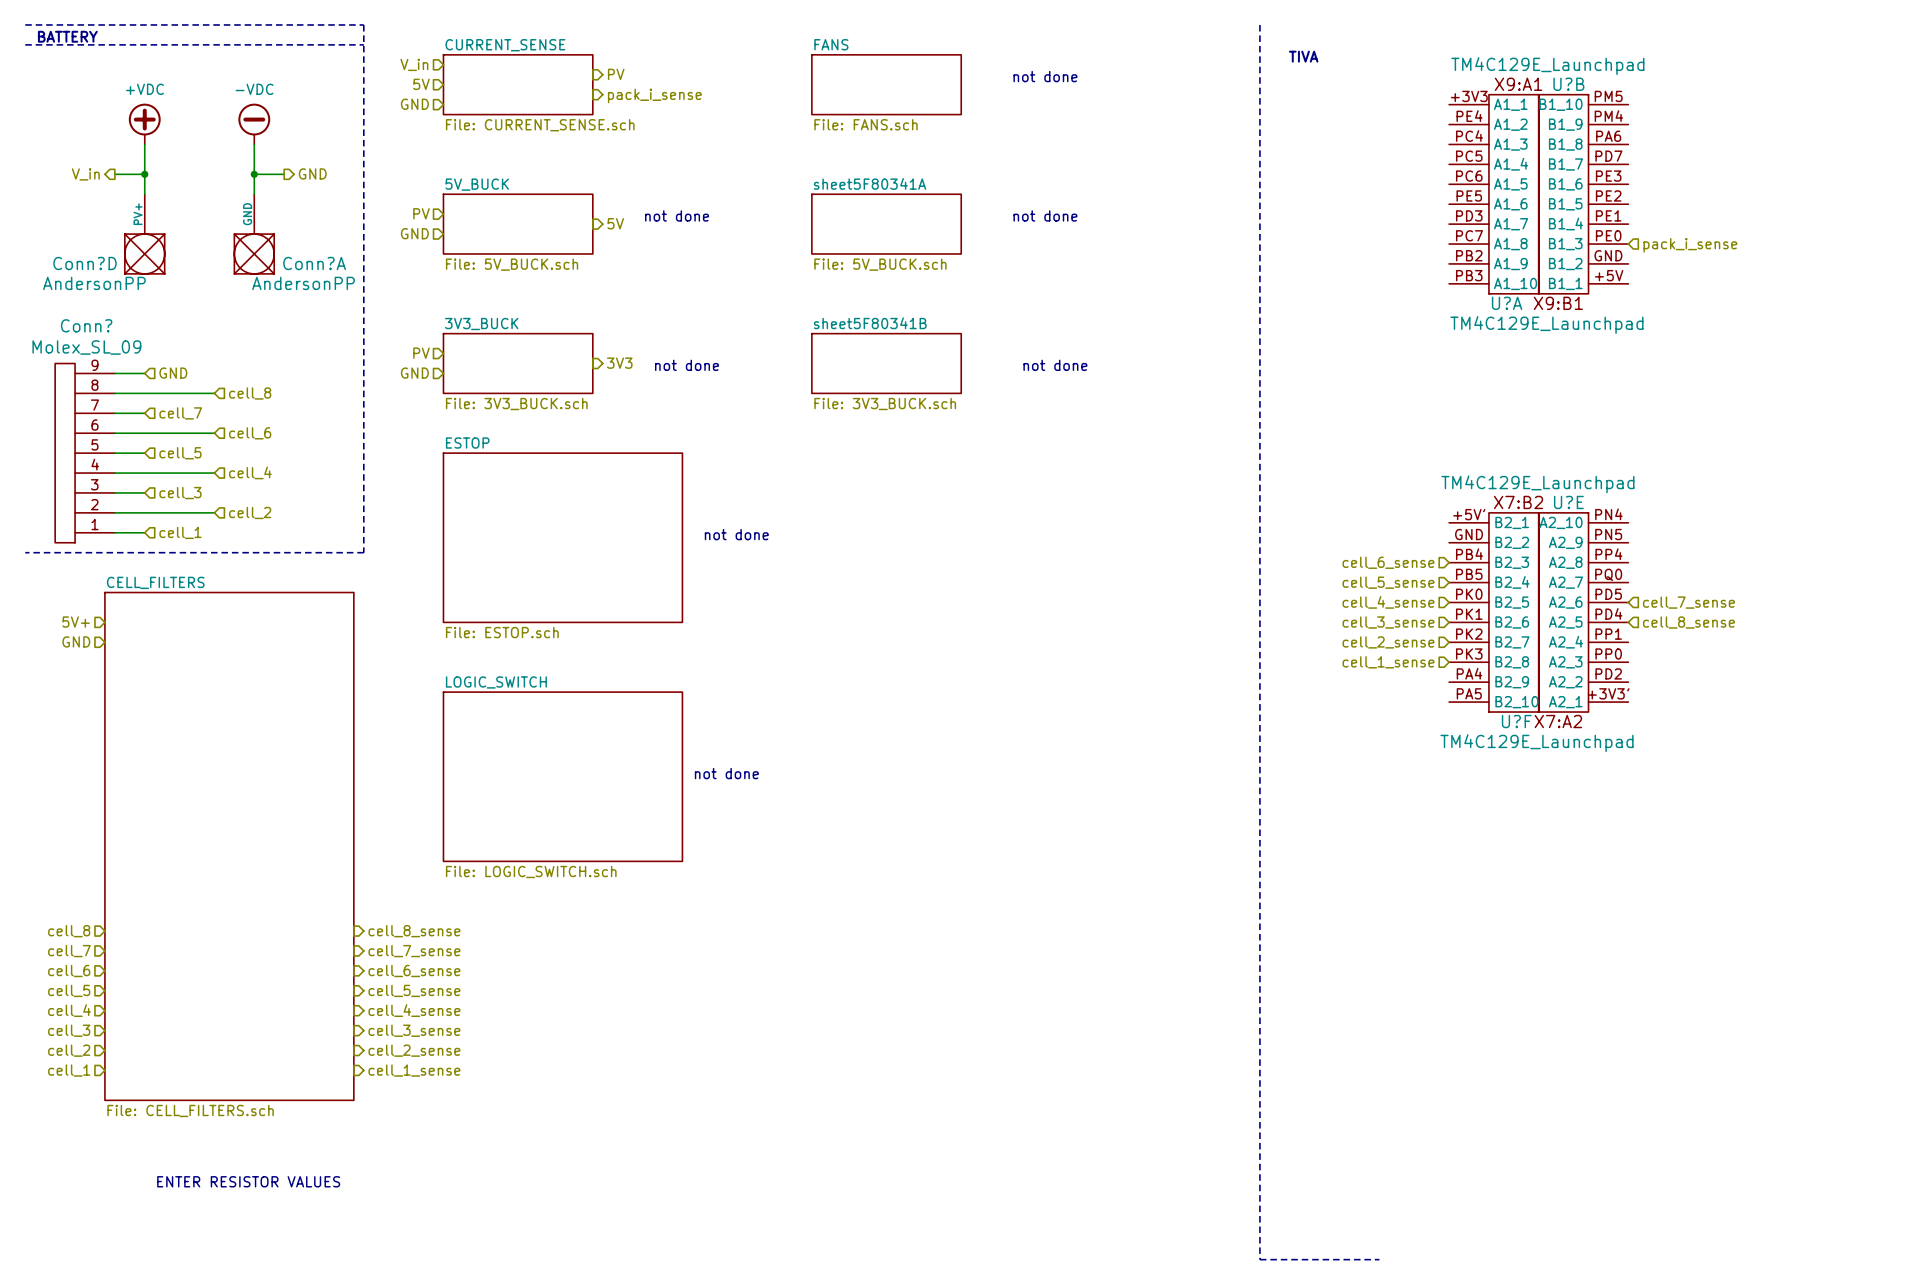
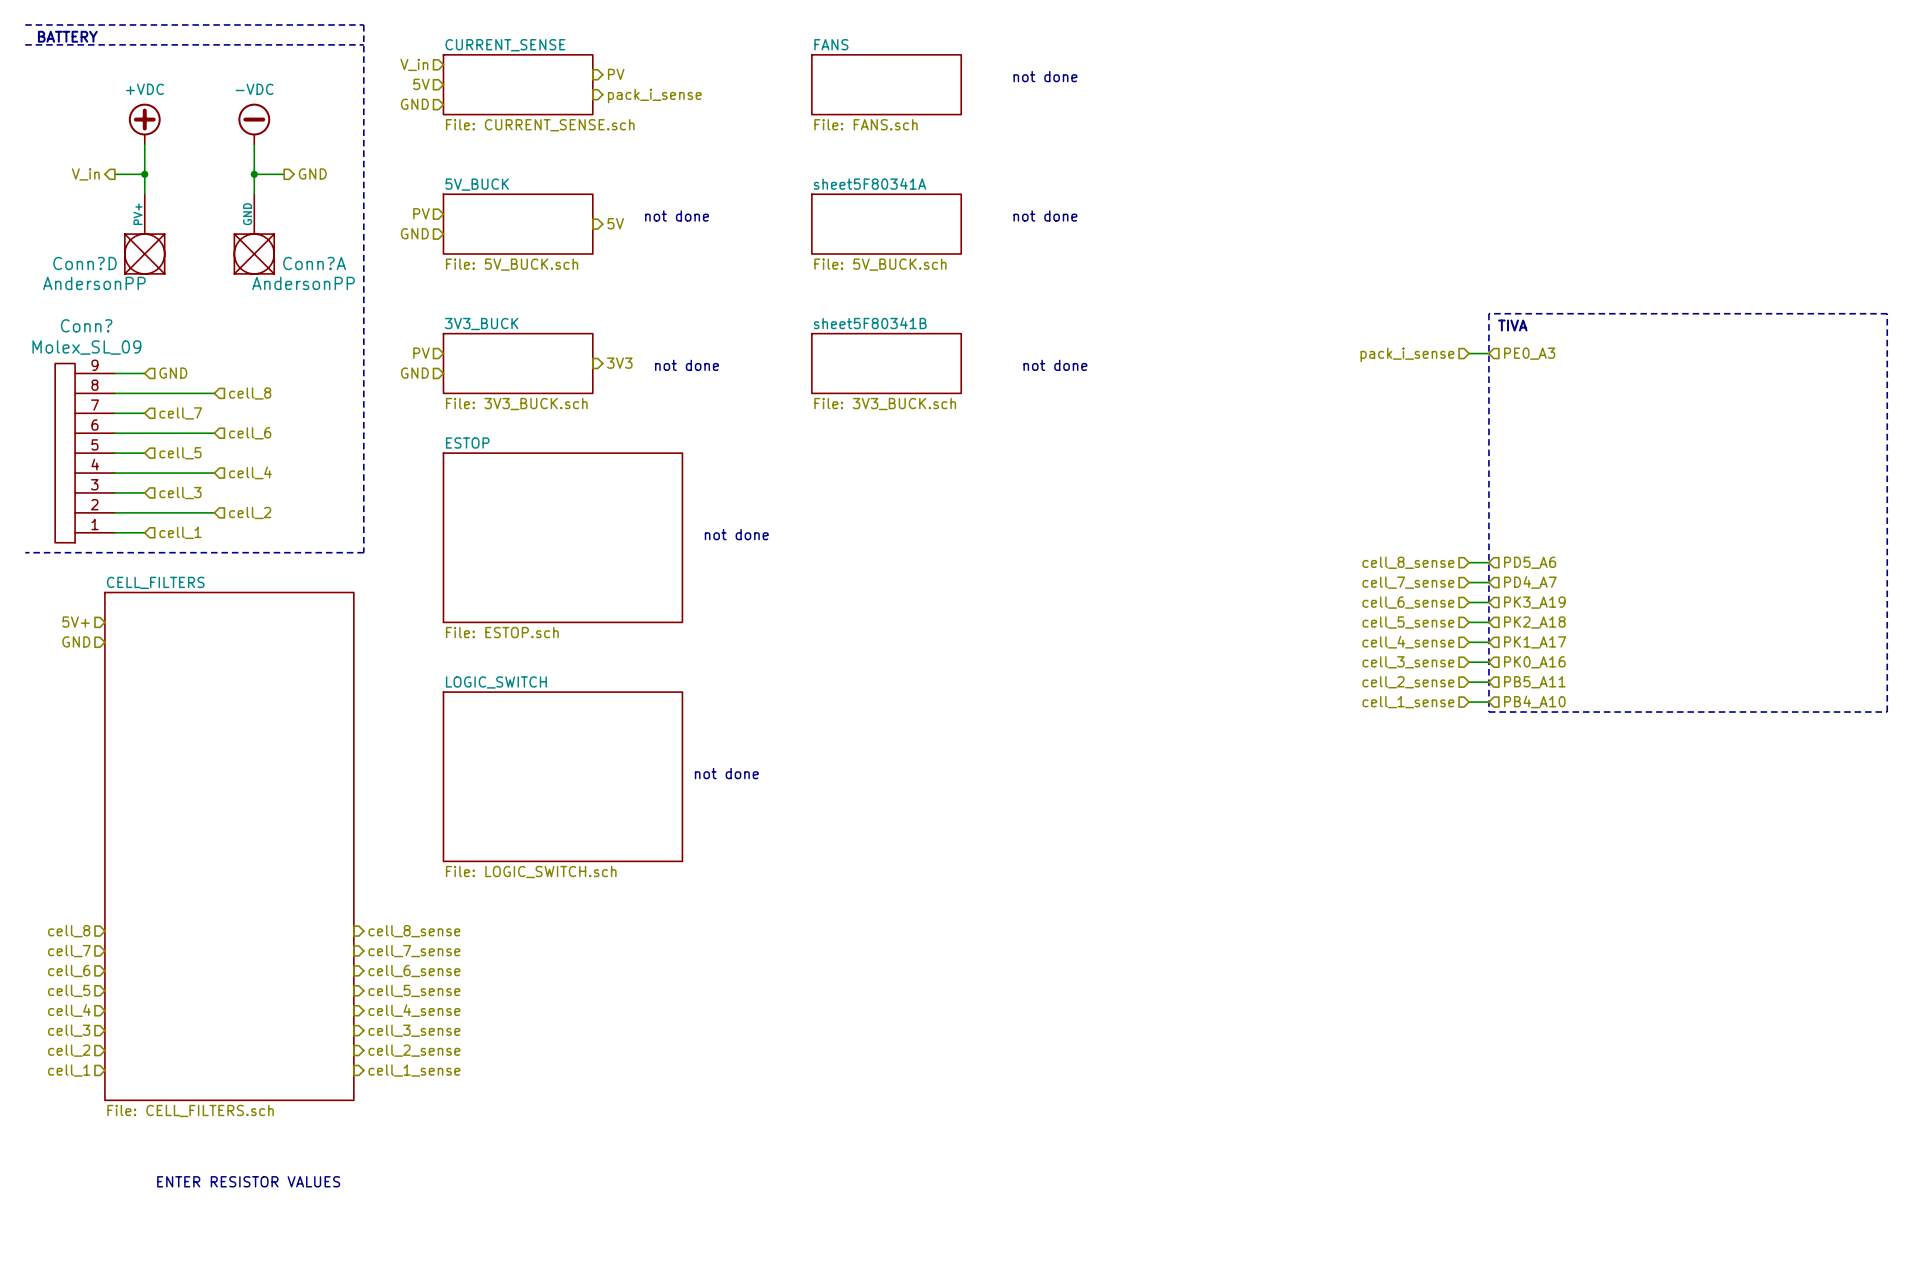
line: (1259, 24) (1259, 1259) (1379, 1259) -> none
text: TIVA (1303, 56) -> none
U?A: TM4C129E_Launchpad (1493, 194) -> none
U?B: TM4C129E_Launchpad (1583, 194) -> none
hierarchical label: pack_i_sense (1690, 245) -> none
line: none -> (1488, 313) (1488, 712) (1887, 712) (1887, 313) (1488, 313)
text: none -> TIVA (1512, 325)
wire: none -> (1469, 353) (1488, 353)
hierarchical label: none -> PE0_A3 (1529, 353)
hierarchical label: none -> pack_i_sense (1407, 354)
hierarchical label position: cell_6_sense (1388, 562) -> cell_6_sense (1408, 602)
hierarchical label: none -> PD5_A6 (1530, 562)
hierarchical label position: cell_5_sense (1388, 582) -> cell_5_sense (1408, 622)
hierarchical label: none -> PD4_A7 (1530, 582)
hierarchical label position: cell_4_sense (1388, 602) -> cell_4_sense (1408, 642)
hierarchical label: none -> PK3_A19 (1534, 602)
hierarchical label rotation: 0° (1688, 602) -> 180° (1408, 582)
hierarchical label position: cell_7_sense (1688, 602) -> cell_7_sense (1408, 582)
U?F: TM4C129E_Launchpad (1493, 612) -> none
U?E: TM4C129E_Launchpad (1583, 612) -> none
hierarchical label position: cell_3_sense (1388, 622) -> cell_3_sense (1408, 662)
hierarchical label: none -> PK2_A18 (1534, 622)
hierarchical label rotation: 0° (1688, 622) -> 180° (1408, 562)
hierarchical label position: cell_8_sense (1688, 622) -> cell_8_sense (1408, 562)
hierarchical label position: cell_2_sense (1388, 642) -> cell_2_sense (1408, 682)
hierarchical label: none -> PK1_A17 (1535, 642)
hierarchical label position: cell_1_sense (1388, 662) -> cell_1_sense (1408, 702)
hierarchical label: none -> PK0_A16 (1534, 662)
hierarchical label: none -> PB5_A11 (1534, 682)
hierarchical label: none -> PB4_A10 (1534, 701)

